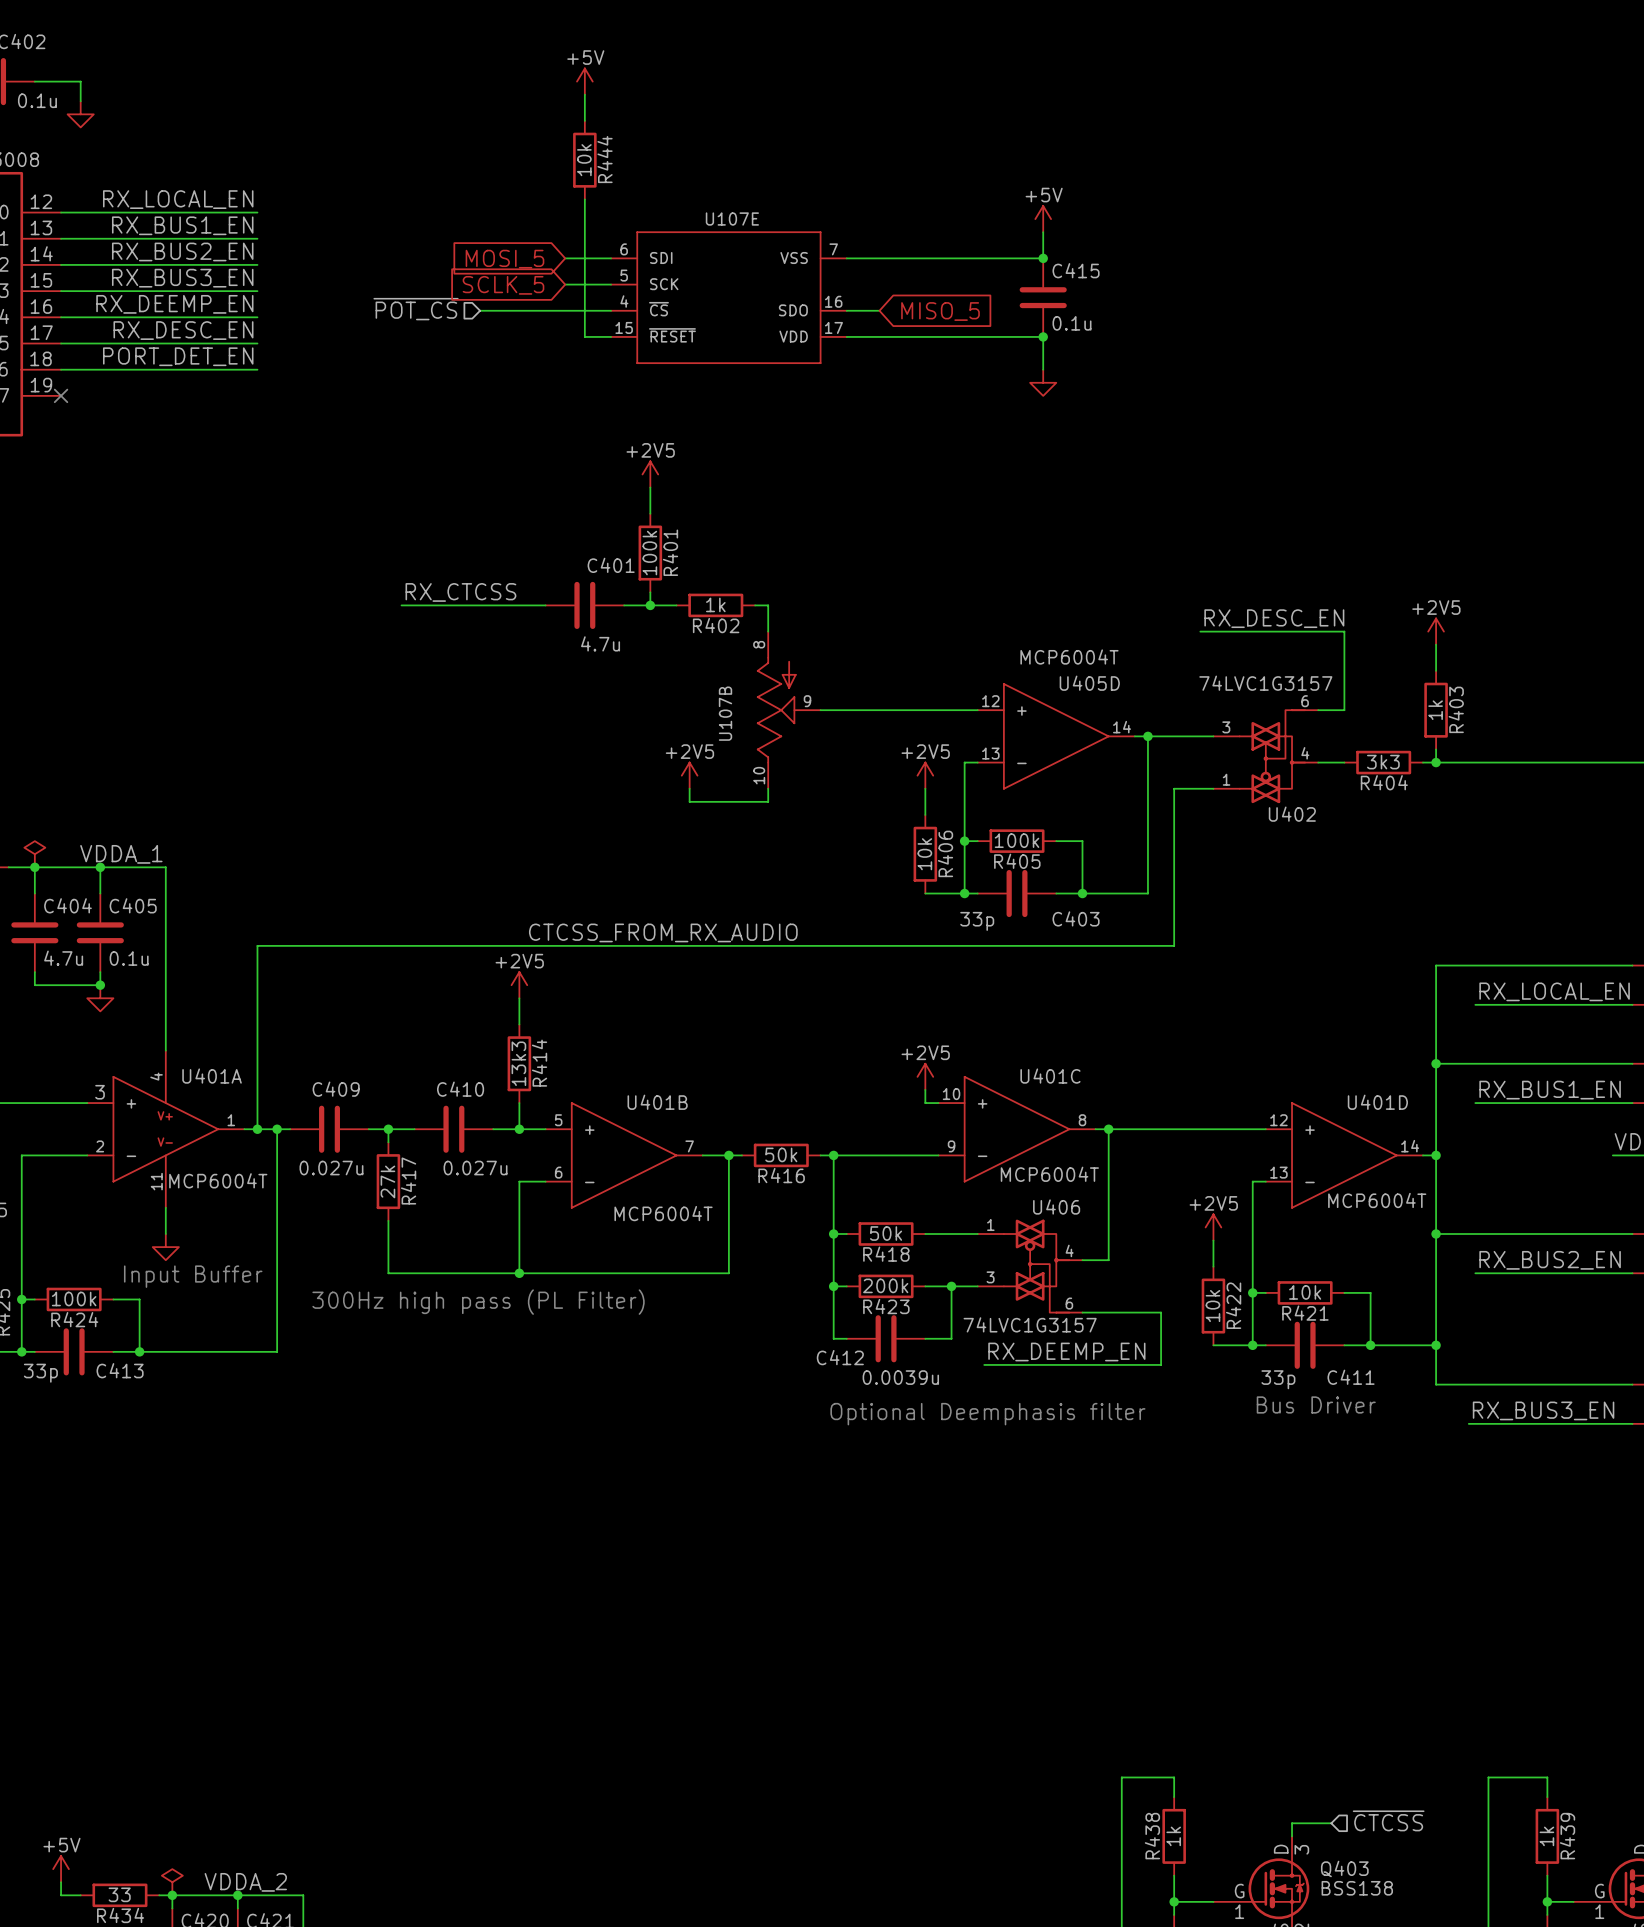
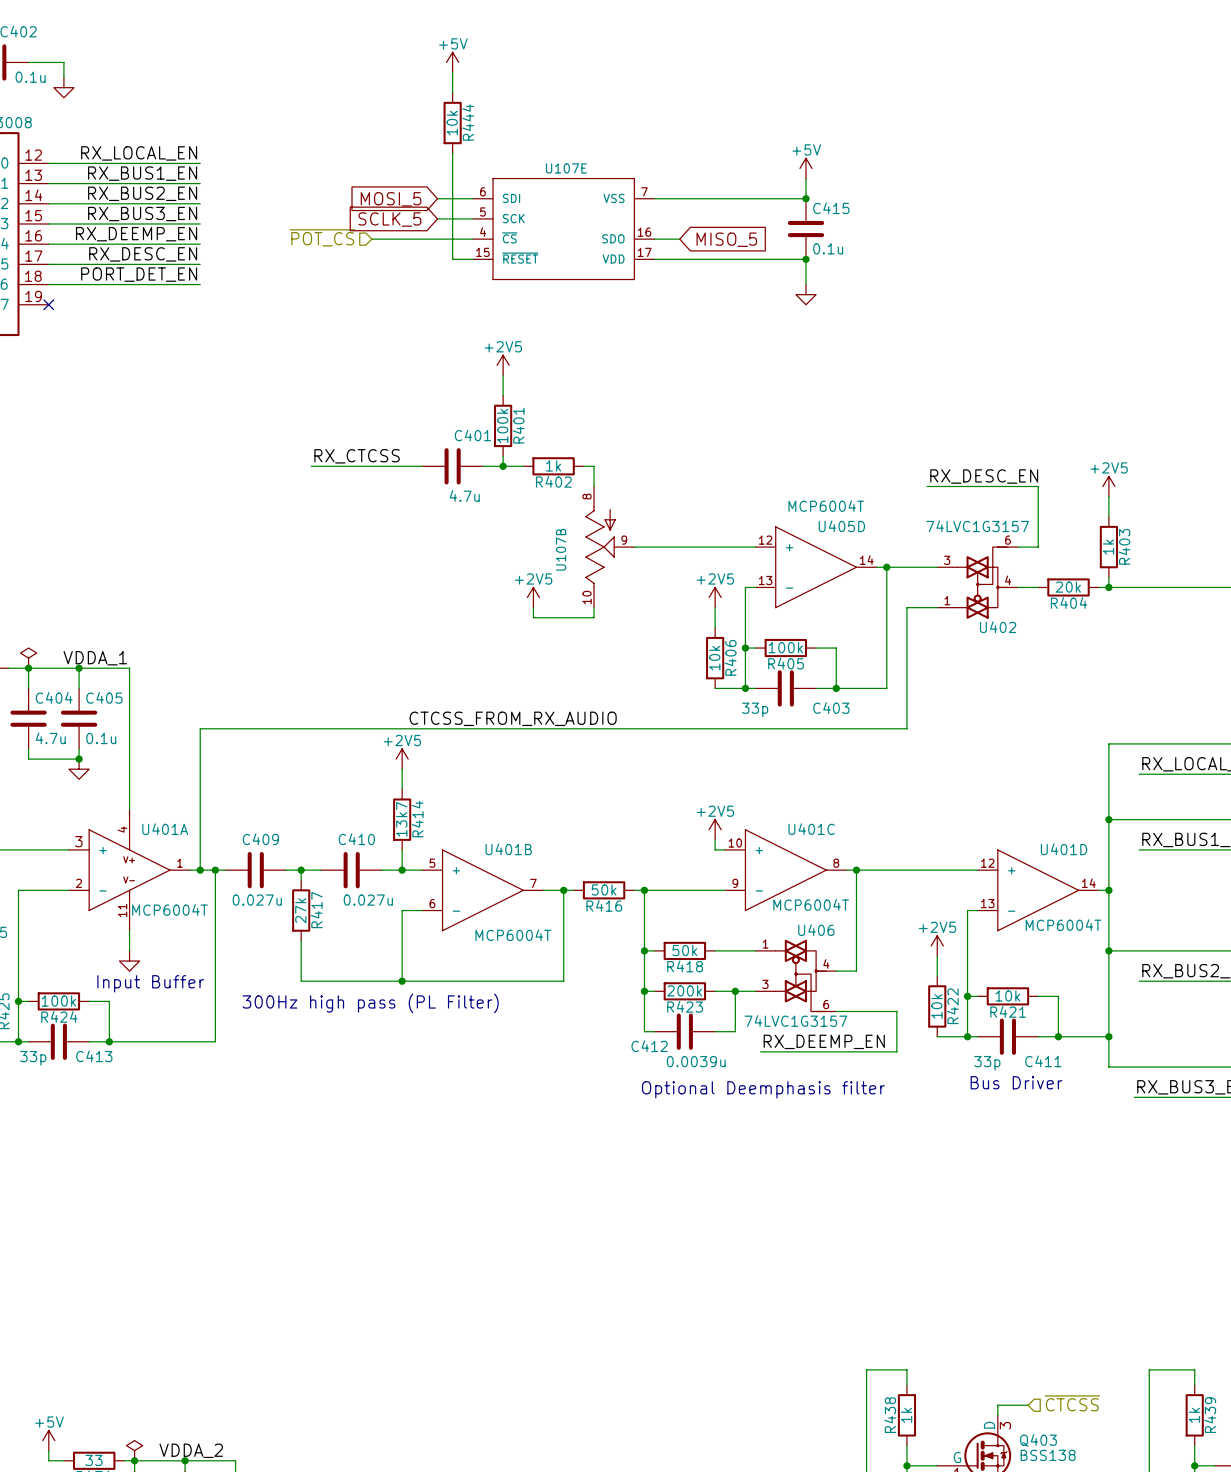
R404 value: 3k3 (1383, 762) -> 20k (1068, 587)
R414 value: 13k3 (518, 1063) -> 13k7 (401, 819)

